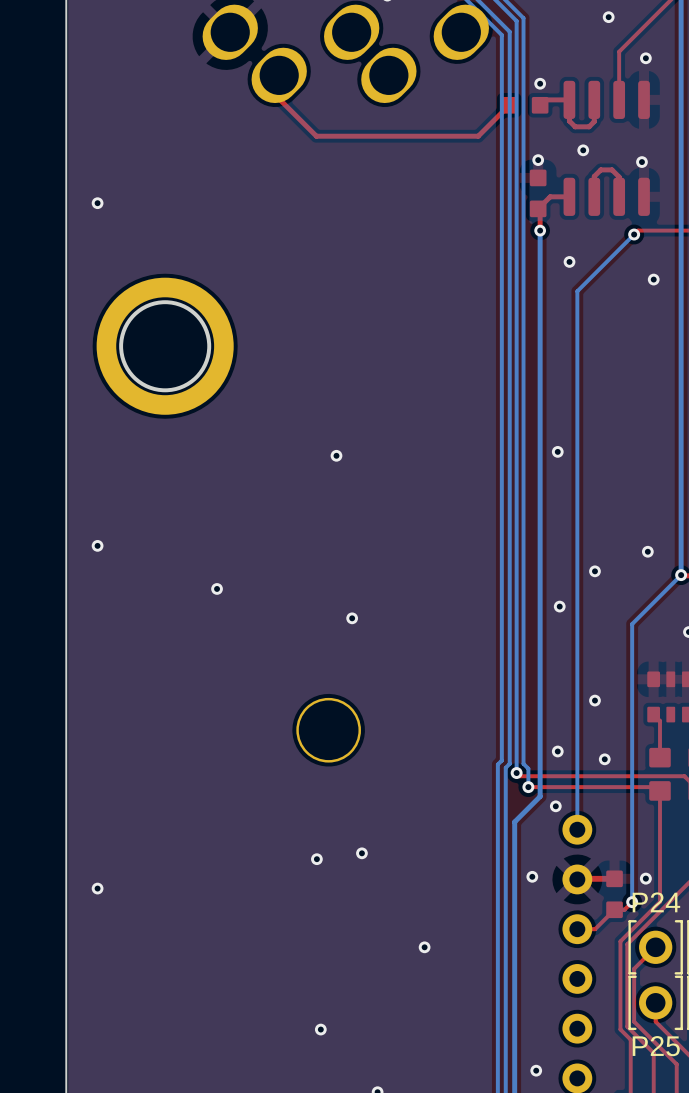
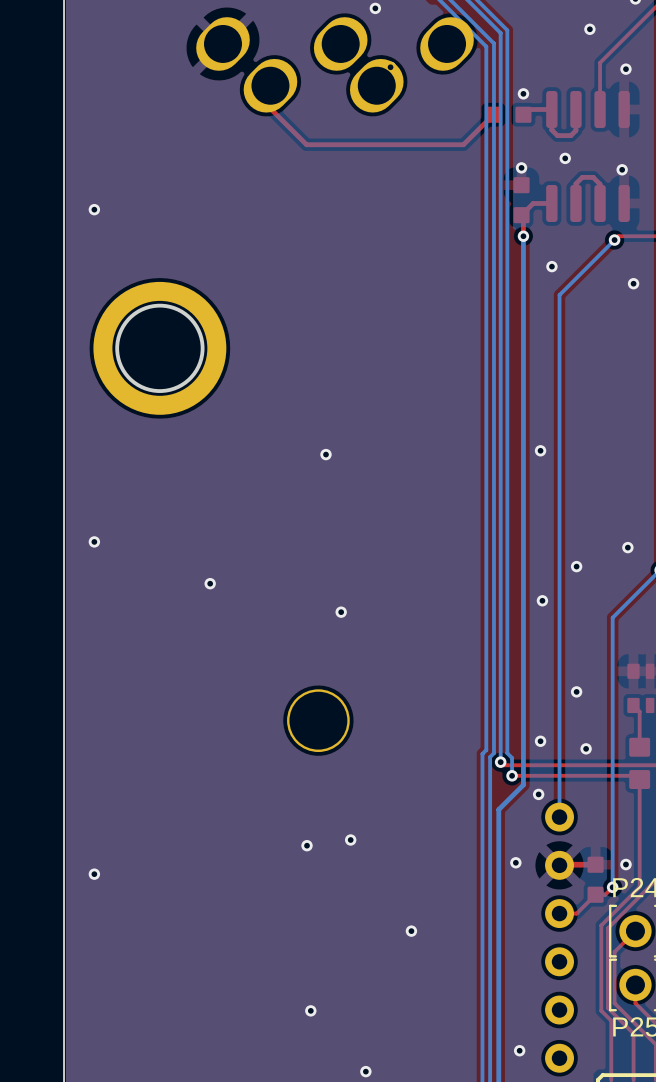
via: none -> (390, 67)

